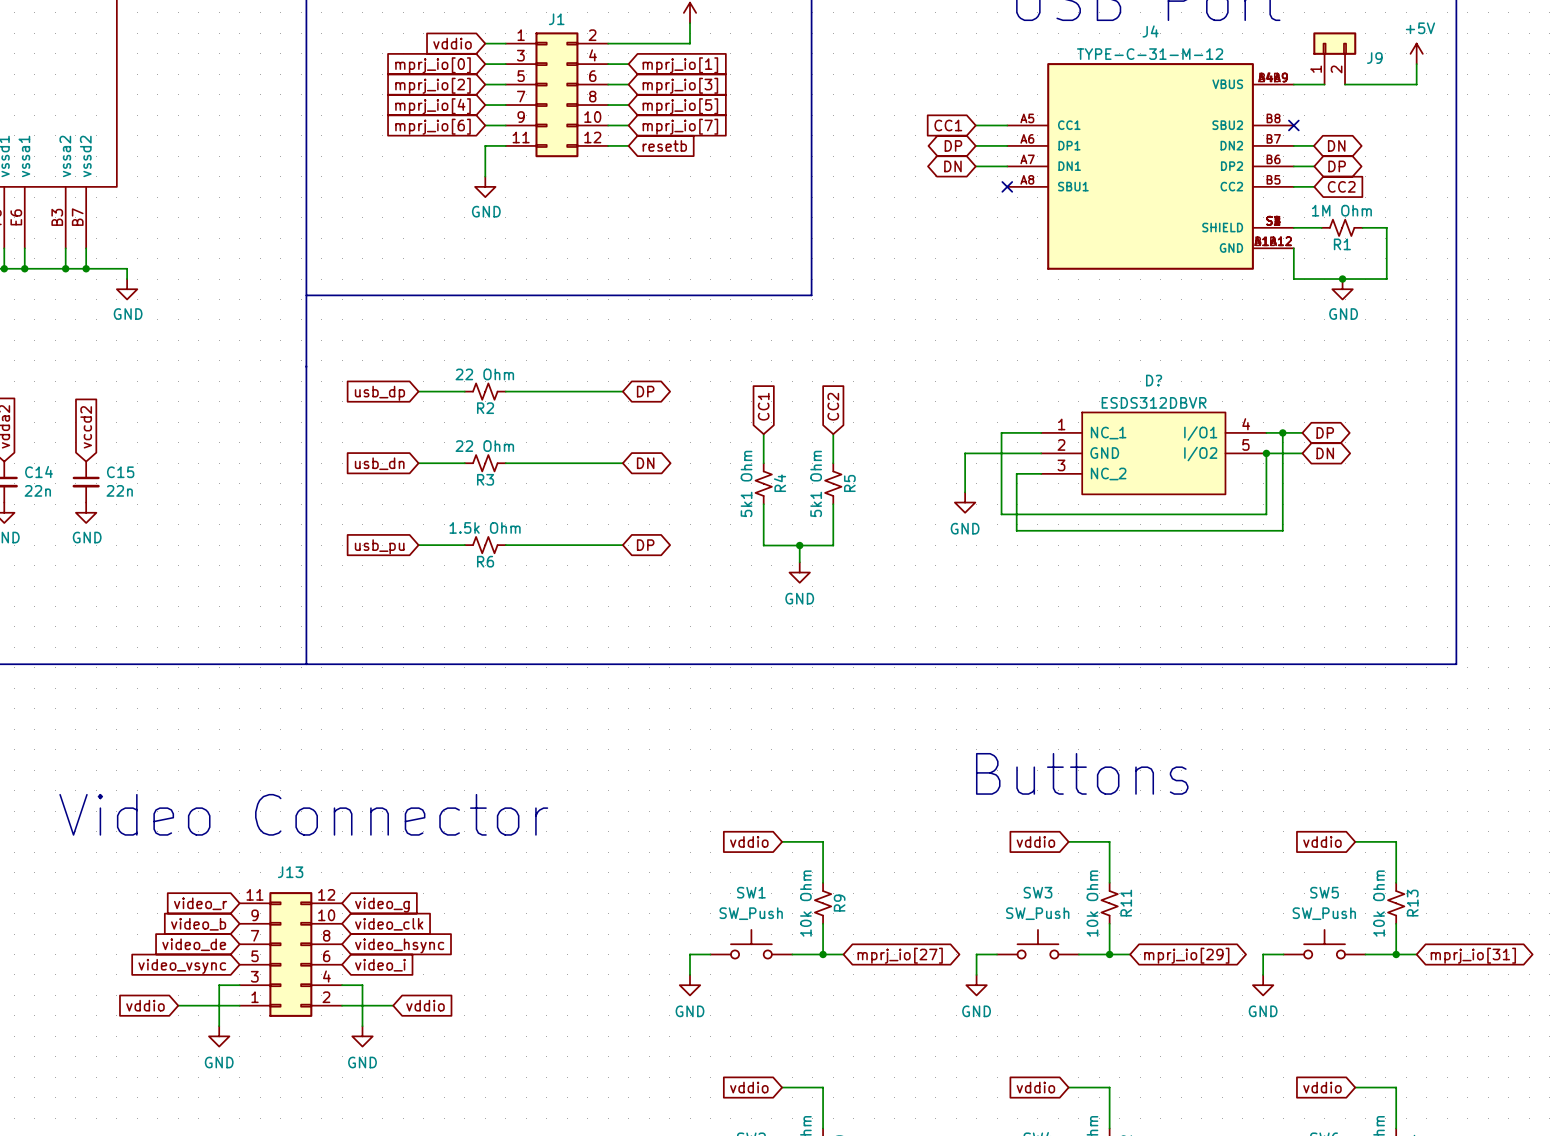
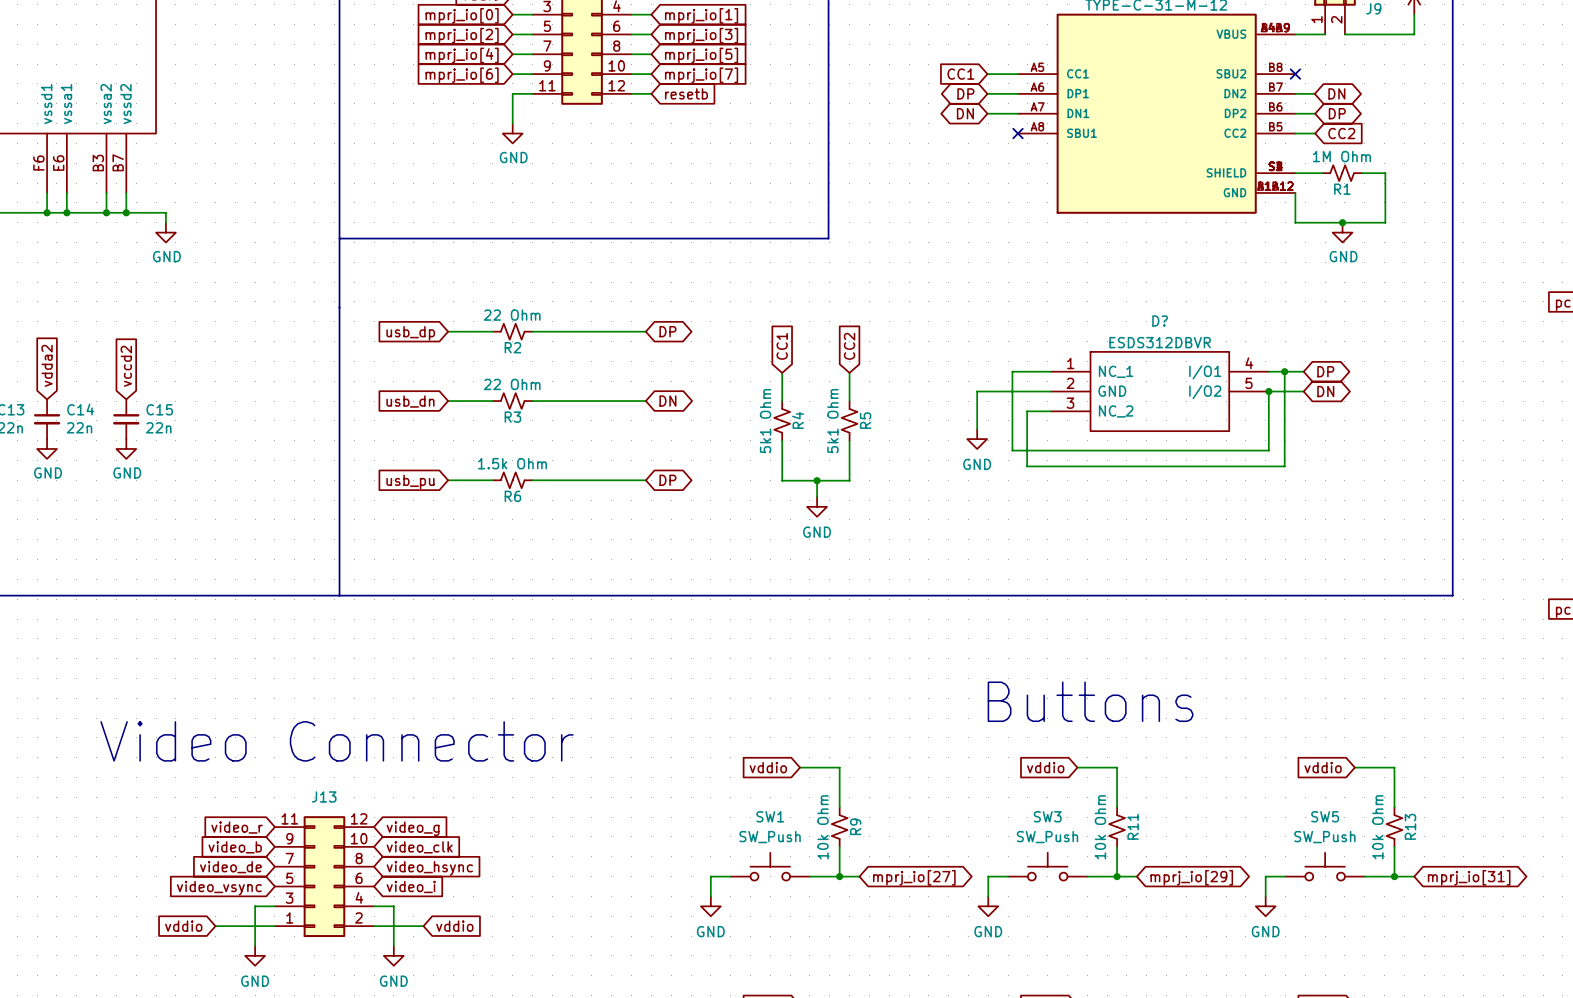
D? symbol: [1041, 411, 1267, 495] -> [1050, 351, 1269, 432]

